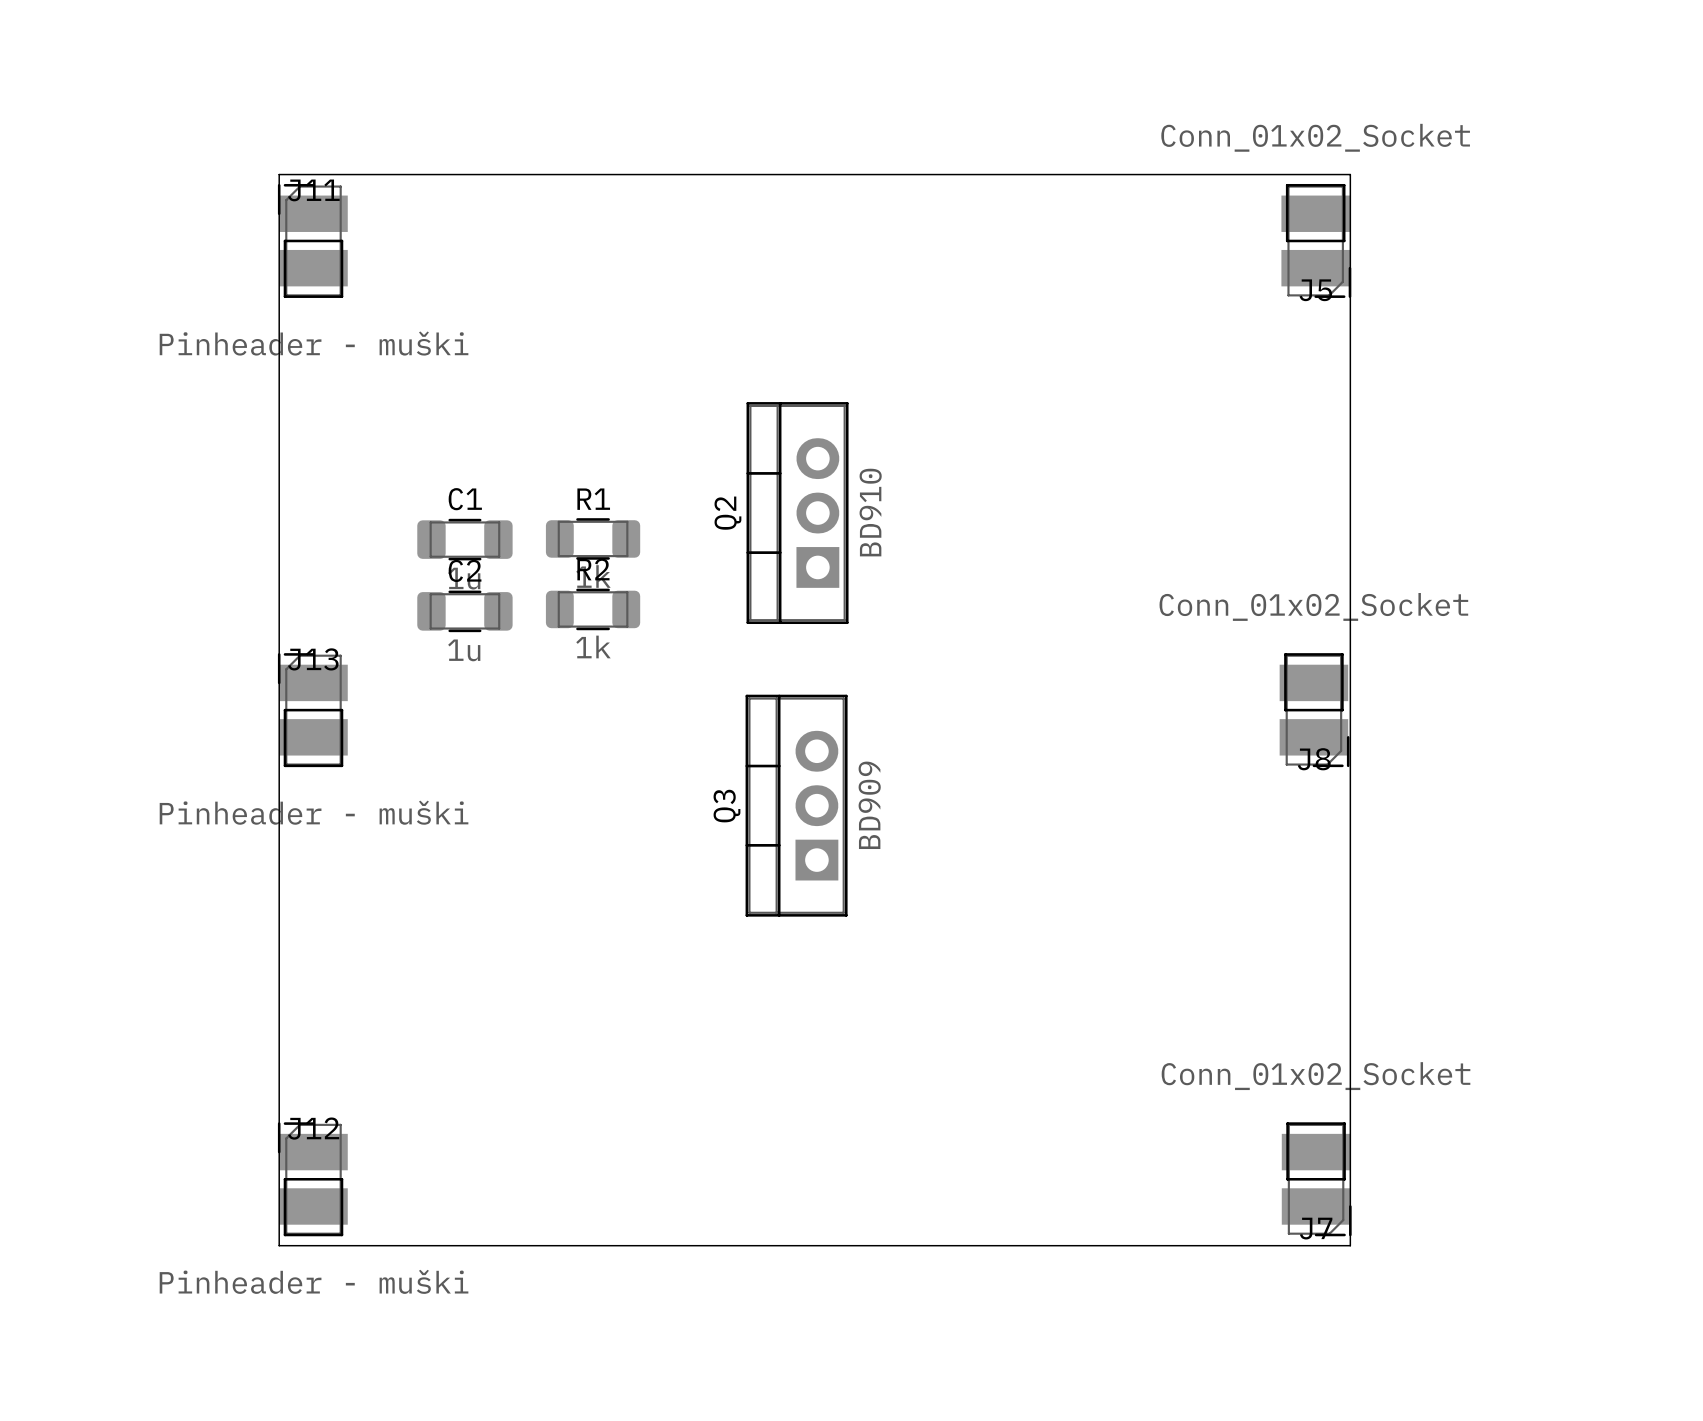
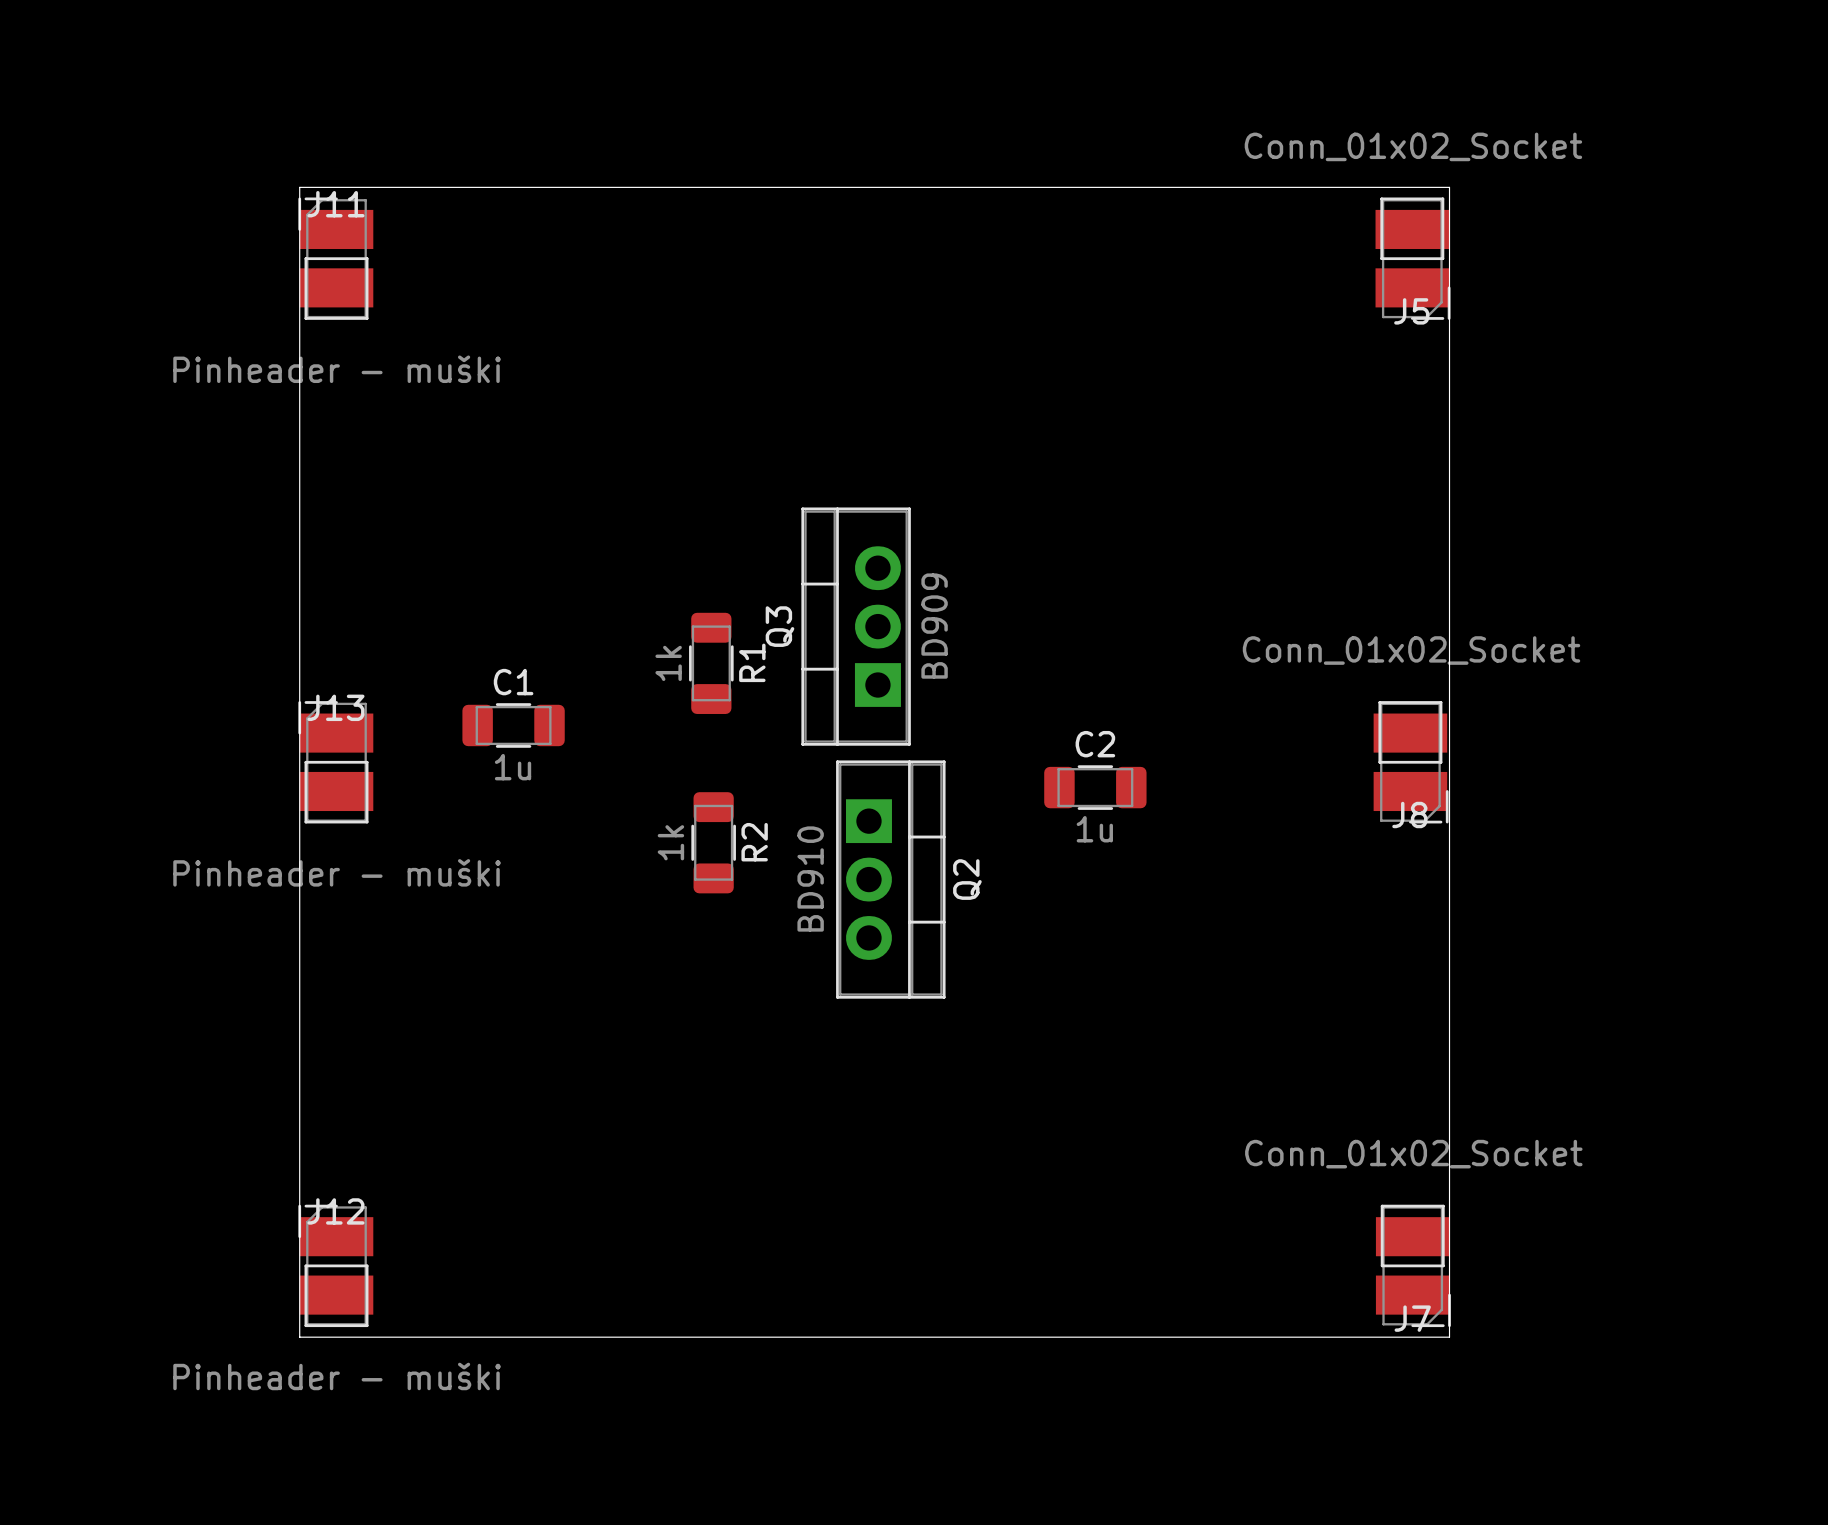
Q2 rotation: 0° (797, 513) -> 180° (890, 879)
Q2 position: (797, 513) -> (890, 879)
R1 rotation: 0° (593, 538) -> 90° clockwise (711, 663)
R1 position: (593, 538) -> (711, 663)
C1 position: (464, 539) -> (513, 725)
R2 rotation: 0° (593, 609) -> 90° clockwise (713, 842)
R2 position: (593, 609) -> (713, 842)
C2 position: (464, 611) -> (1095, 787)
Q3 position: (796, 805) -> (856, 626)

